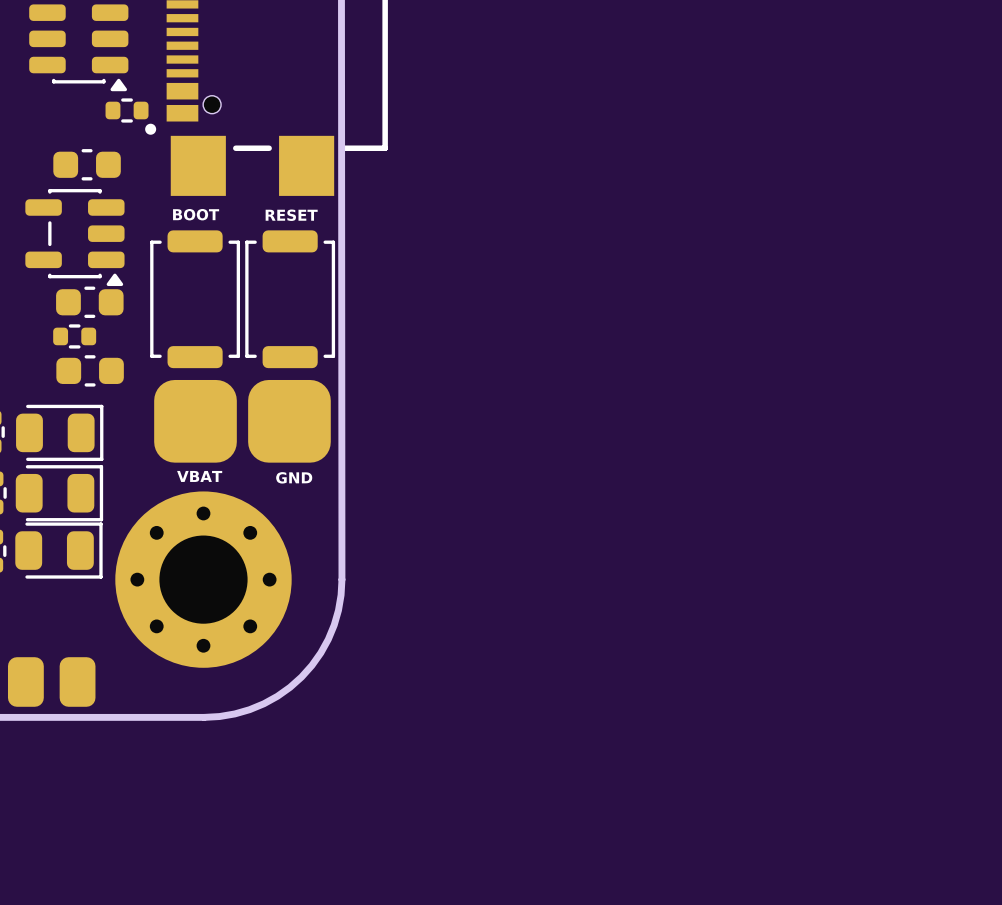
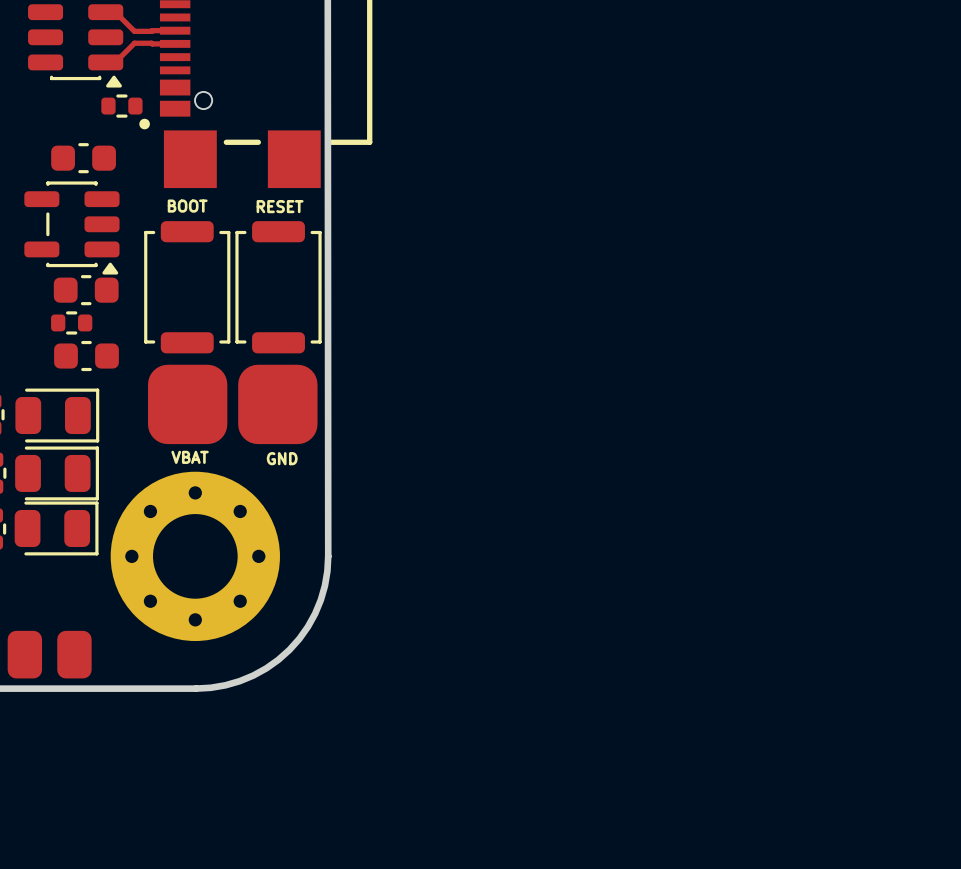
track: none -> (105, 12) (115, 12) (134, 31) (175, 30)
track: none -> (175, 43) (134, 43) (115, 62) (105, 62)

